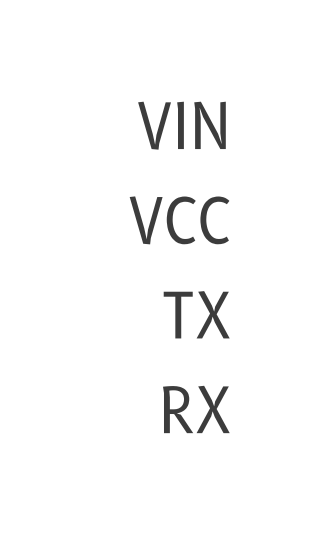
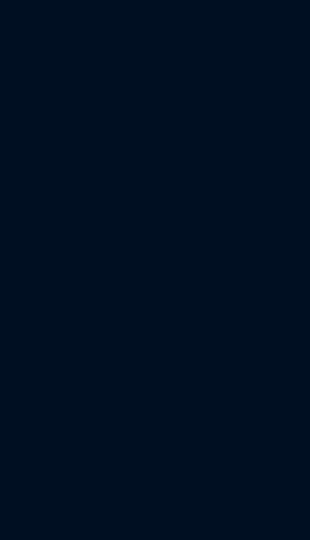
text: VIN (181, 125) -> none
text: VCC (179, 220) -> none
text: TX (196, 314) -> none
text: RX (196, 409) -> none

